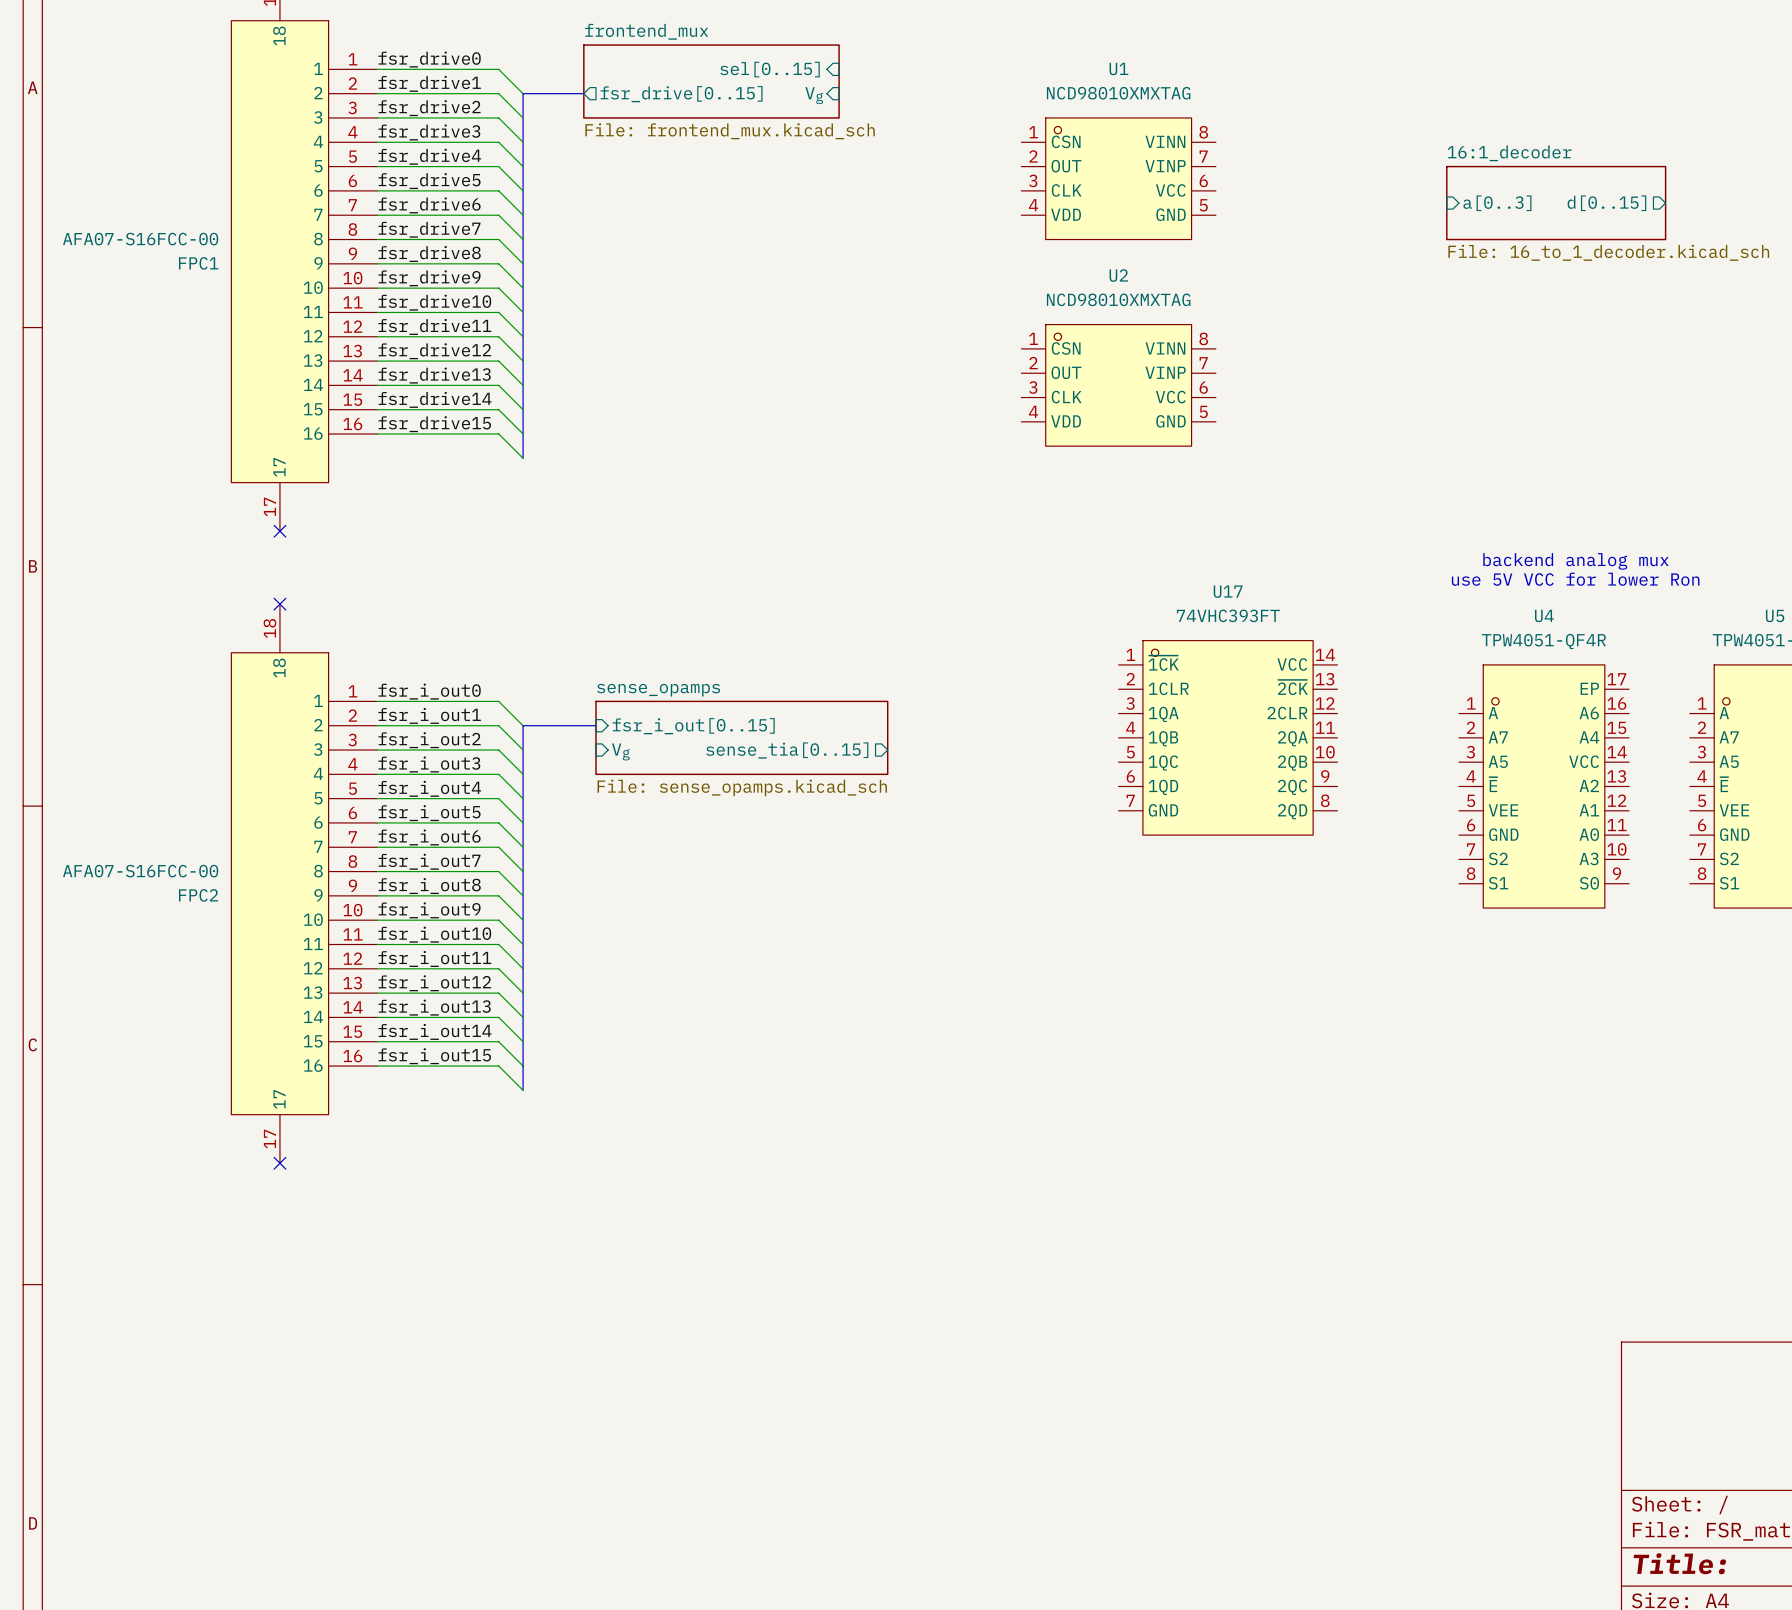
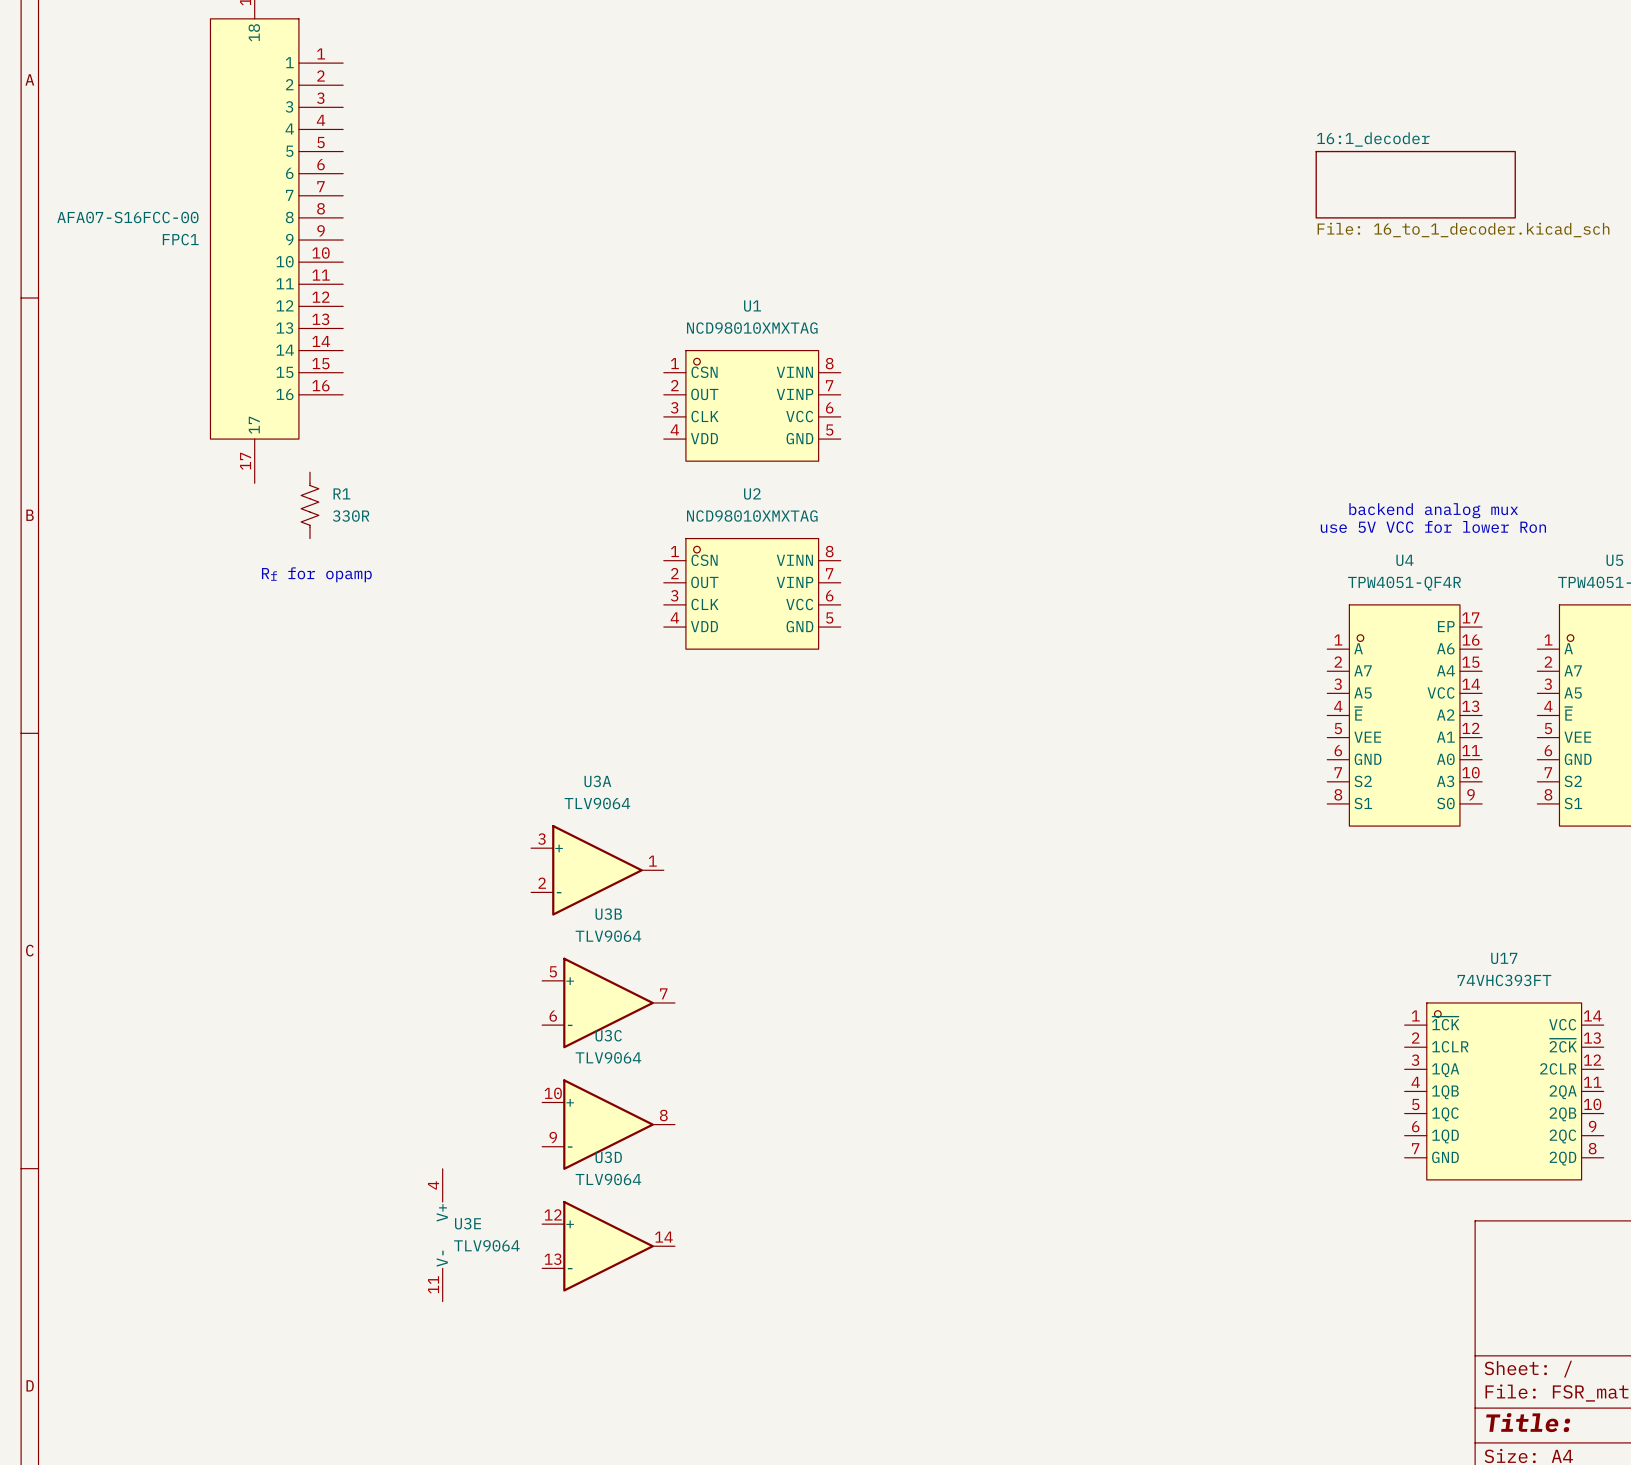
label: fsr_drive0 (429, 59) -> none
wire: (377, 69) (498, 69) (523, 93) -> none
sheet pin: sel[0..15] (770, 69) -> none
sheet frontend_mux: File: frontend_mux.kicad_sch (711, 81) -> none
label: fsr_drive1 (429, 83) -> none
wire: (377, 93) (498, 93) (523, 117) -> none
bus: (583, 93) (523, 93) (523, 458) -> none
sheet pin: fsr_drive[0..15] (681, 94) -> none
sheet pin: Vg (814, 95) -> none
label: fsr_drive2 (429, 108) -> none
wire: (377, 117) (498, 117) (523, 142) -> none
label: fsr_drive3 (429, 132) -> none
wire: (377, 142) (498, 142) (523, 166) -> none
label: fsr_drive4 (429, 156) -> none
wire: (377, 166) (498, 166) (523, 190) -> none
U1 position: (1118, 178) -> (752, 405)
label: fsr_drive5 (429, 181) -> none
wire: (377, 190) (498, 190) (523, 215) -> none
sheet pin: a[0..3] (1497, 203) -> none
sheet pin: d[0..15] (1606, 203) -> none
label: fsr_drive6 (429, 205) -> none
wire: (377, 215) (498, 215) (523, 239) -> none
label: fsr_drive7 (429, 229) -> none
wire: (377, 239) (498, 239) (523, 263) -> none
label: fsr_drive8 (429, 254) -> none
wire: (377, 263) (498, 263) (523, 288) -> none
label: fsr_drive9 (429, 278) -> none
wire: (377, 288) (498, 288) (523, 312) -> none
label: fsr_drive10 (434, 302) -> none
wire: (377, 312) (498, 312) (523, 336) -> none
label: fsr_drive11 (434, 326) -> none
wire: (377, 336) (498, 336) (523, 361) -> none
label: fsr_drive12 (434, 351) -> none
wire: (377, 361) (498, 361) (523, 385) -> none
label: fsr_drive13 (434, 375) -> none
wire: (377, 385) (498, 385) (523, 409) -> none
U2 position: (1118, 385) -> (752, 593)
label: fsr_drive14 (434, 399) -> none
wire: (377, 409) (498, 409) (523, 434) -> none
label: fsr_drive15 (434, 424) -> none
wire: (377, 434) (498, 434) (523, 458) -> none
no-connect mark: (279, 531) -> none
R1: none -> 330R (309, 505)
no-connect mark: (279, 604) -> none
text: none -> Rf for opamp (316, 574)
label: fsr_i_out0 (429, 691) -> none
wire: (377, 701) (498, 701) (523, 725) -> none
label: fsr_i_out1 (429, 715) -> none
wire: (377, 725) (498, 725) (523, 750) -> none
bus: (595, 725) (523, 725) (523, 1090) -> none
sheet pin: fsr_i_out[0..15] (693, 726) -> none
sheet sense_opamps: File: sense_opamps.kicad_sch (741, 737) -> none
U17 position: (1228, 737) -> (1504, 1091)
label: fsr_i_out2 (429, 740) -> none
wire: (377, 750) (498, 750) (523, 774) -> none
sheet pin: sense_tia[0..15] (787, 750) -> none
sheet pin: Vg (620, 751) -> none
label: fsr_i_out3 (429, 764) -> none
wire: (377, 774) (498, 774) (523, 798) -> none
label: fsr_i_out4 (429, 788) -> none
wire: (377, 798) (498, 798) (523, 822) -> none
label: fsr_i_out5 (429, 813) -> none
wire: (377, 822) (498, 822) (523, 847) -> none
label: fsr_i_out6 (429, 837) -> none
wire: (377, 847) (498, 847) (523, 871) -> none
label: fsr_i_out7 (429, 861) -> none
wire: (377, 871) (498, 871) (523, 895) -> none
FPC2: AFA07-S16FCC-00 (304, 883) -> none
label: fsr_i_out8 (429, 886) -> none
wire: (377, 895) (498, 895) (523, 920) -> none
label: fsr_i_out9 (429, 910) -> none
wire: (377, 920) (498, 920) (523, 944) -> none
label: fsr_i_out10 (434, 934) -> none
wire: (377, 944) (498, 944) (523, 968) -> none
U3A: none -> TLV9064 (597, 870)
label: fsr_i_out11 (434, 958) -> none
wire: (377, 968) (498, 968) (523, 993) -> none
label: fsr_i_out12 (434, 983) -> none
wire: (377, 993) (498, 993) (523, 1017) -> none
label: fsr_i_out13 (434, 1007) -> none
wire: (377, 1017) (498, 1017) (523, 1041) -> none
label: fsr_i_out14 (434, 1031) -> none
wire: (377, 1041) (498, 1041) (523, 1066) -> none
label: fsr_i_out15 (434, 1056) -> none
wire: (377, 1066) (498, 1066) (523, 1090) -> none
U3B: none -> TLV9064 (608, 1002)
no-connect mark: (279, 1163) -> none
U3C: none -> TLV9064 (608, 1124)
U3E: none -> TLV9064 (442, 1235)
U3D: none -> TLV9064 (608, 1246)

